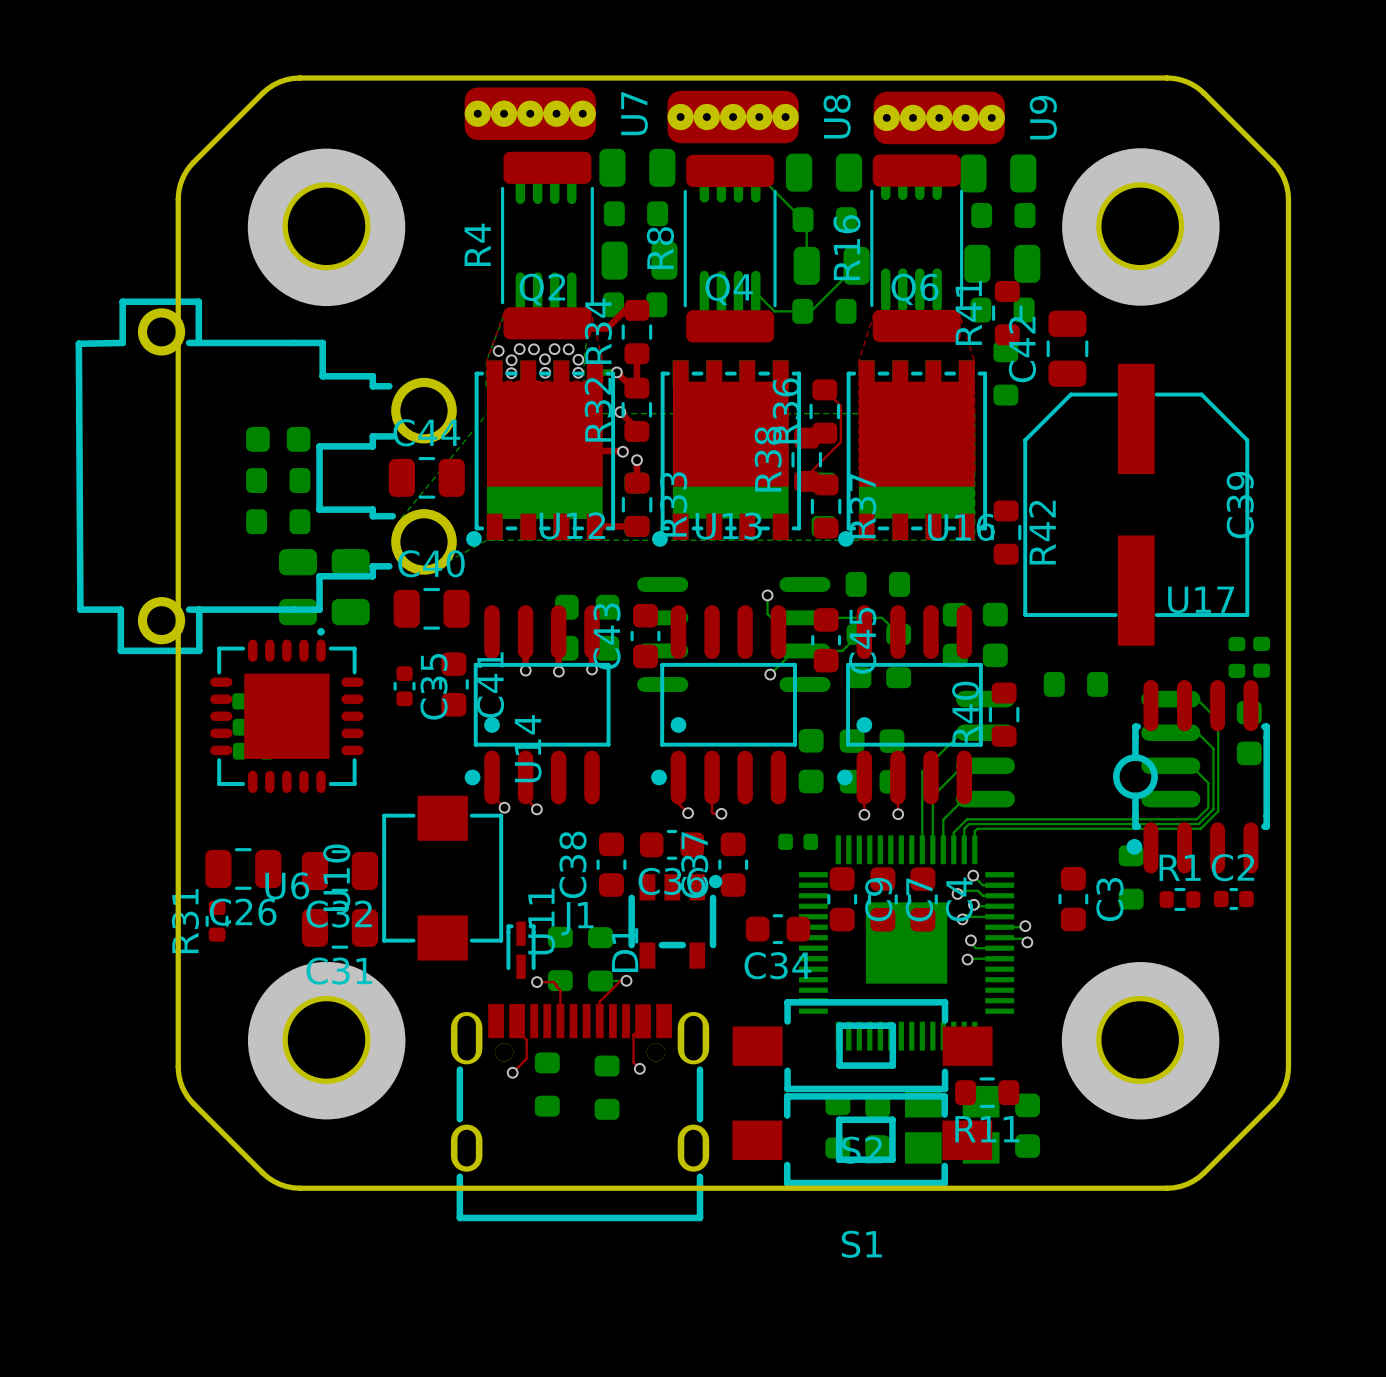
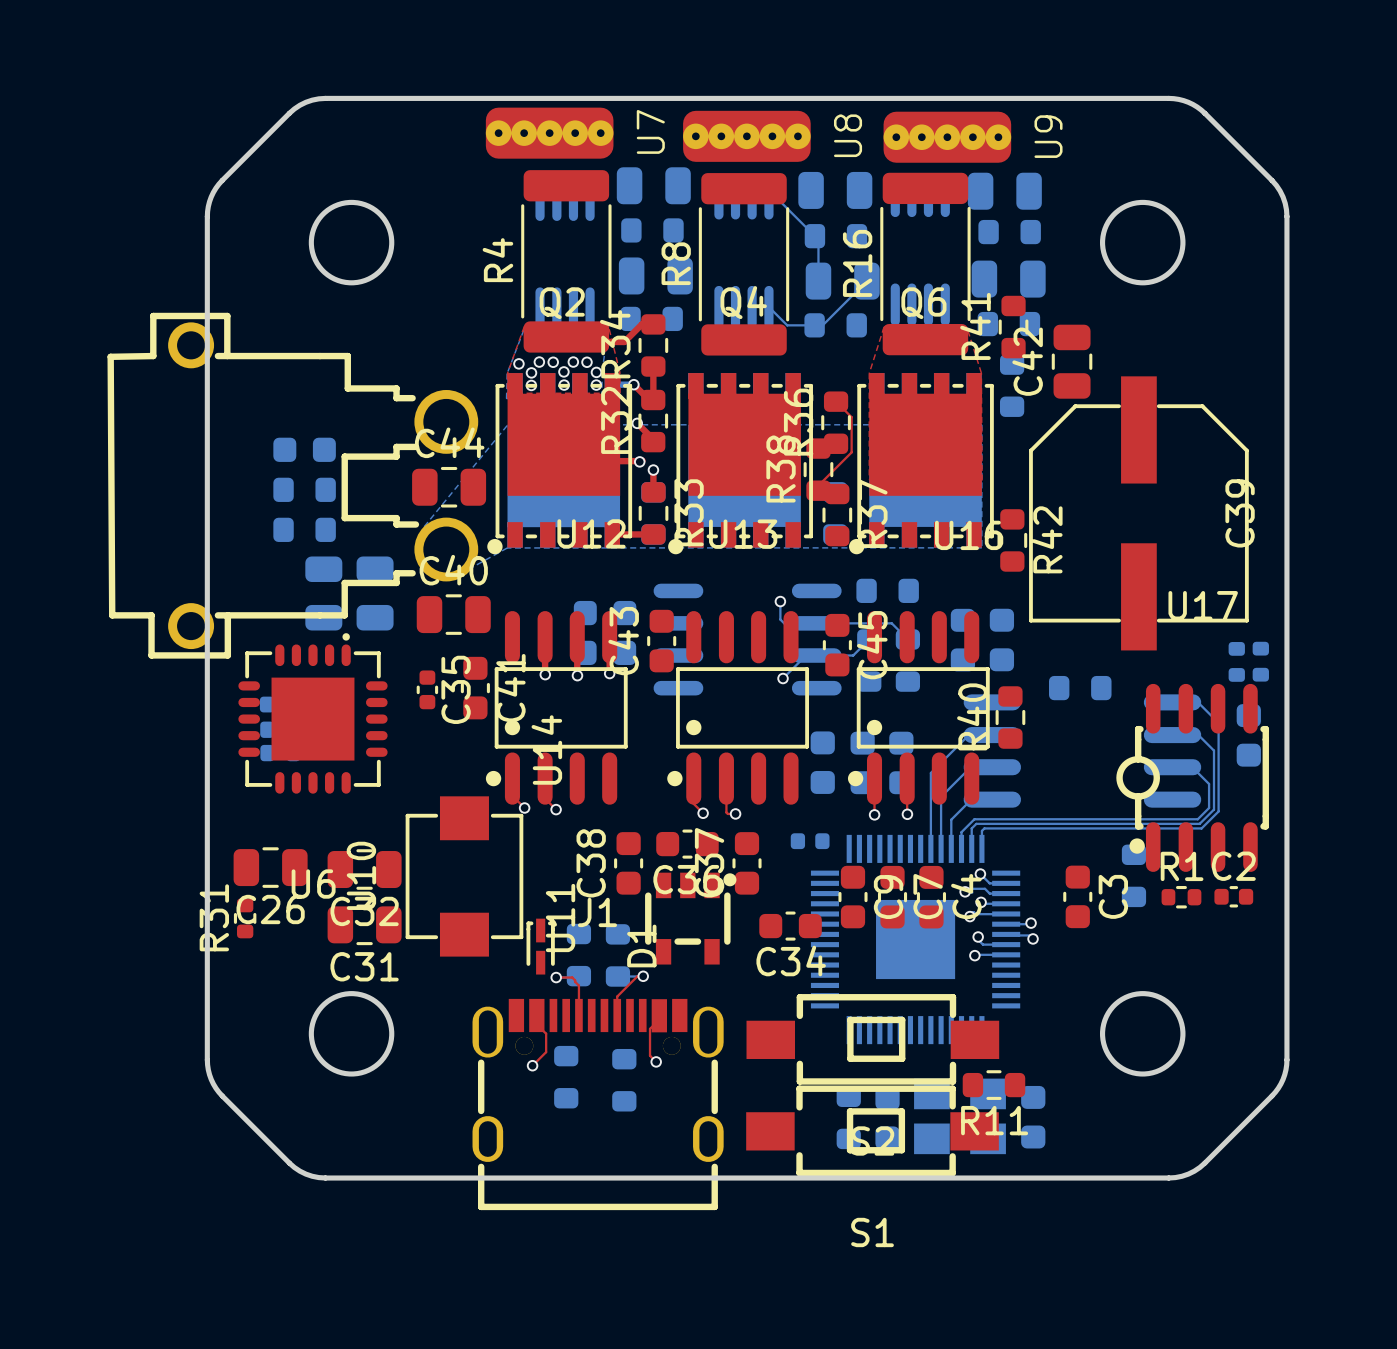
via: (1140, 226) -> none
via: (326, 227) -> none
via: (326, 1040) -> none
via: (1140, 1040) -> none

